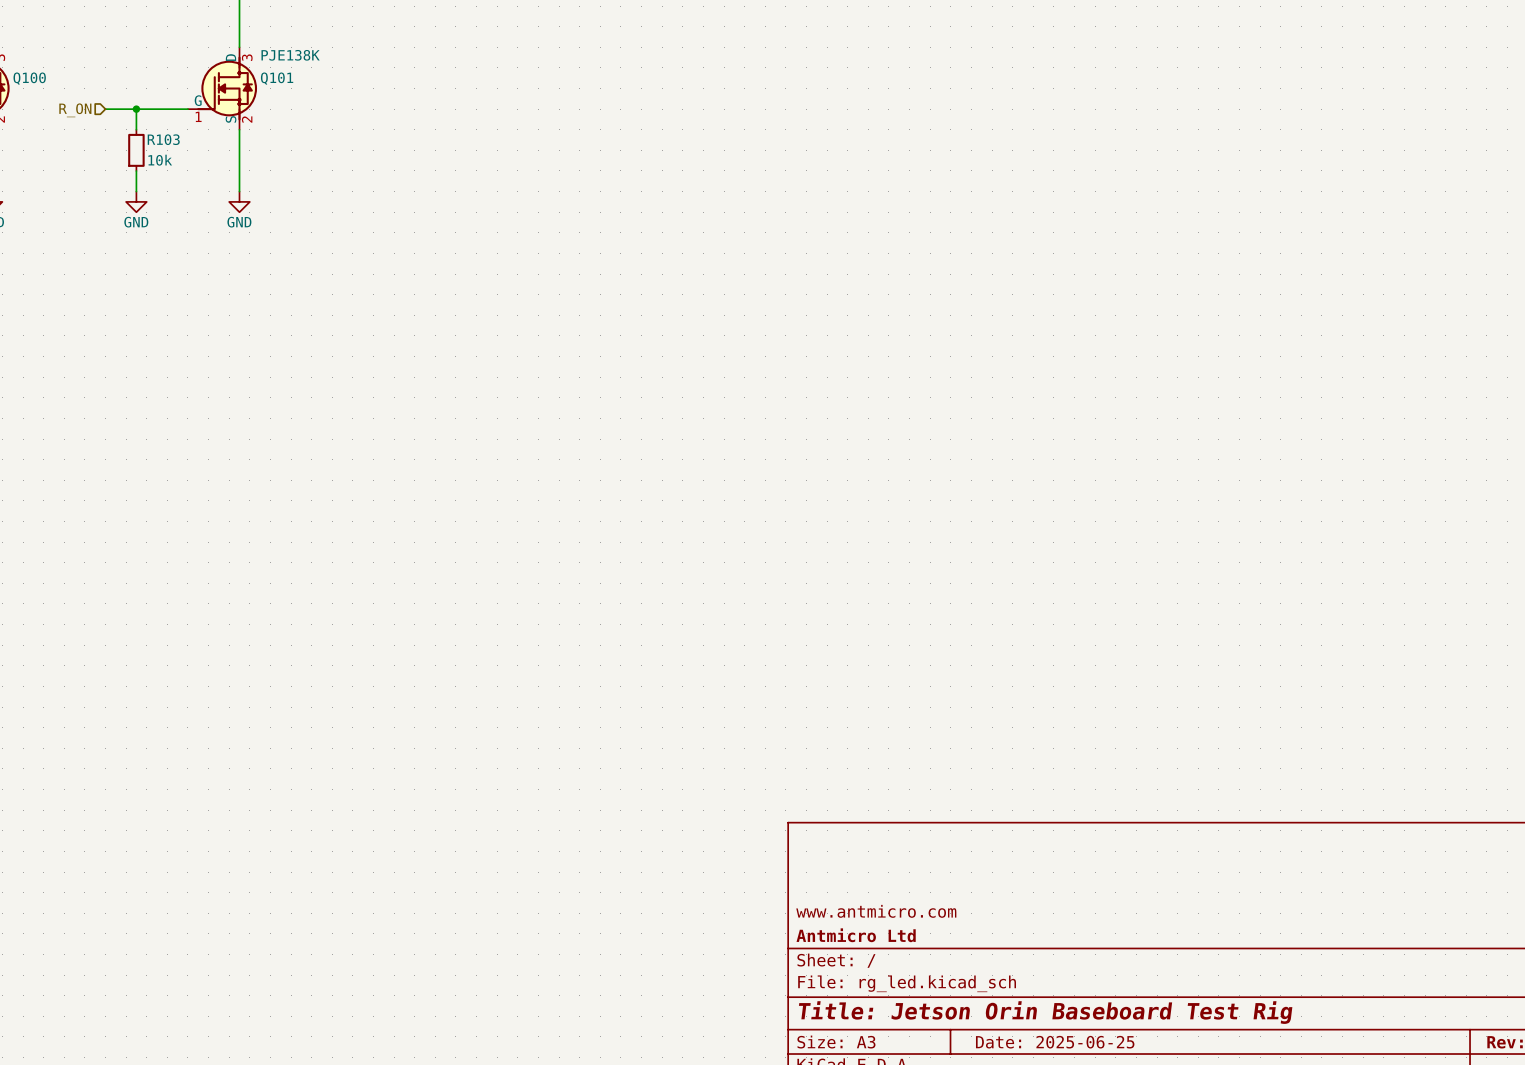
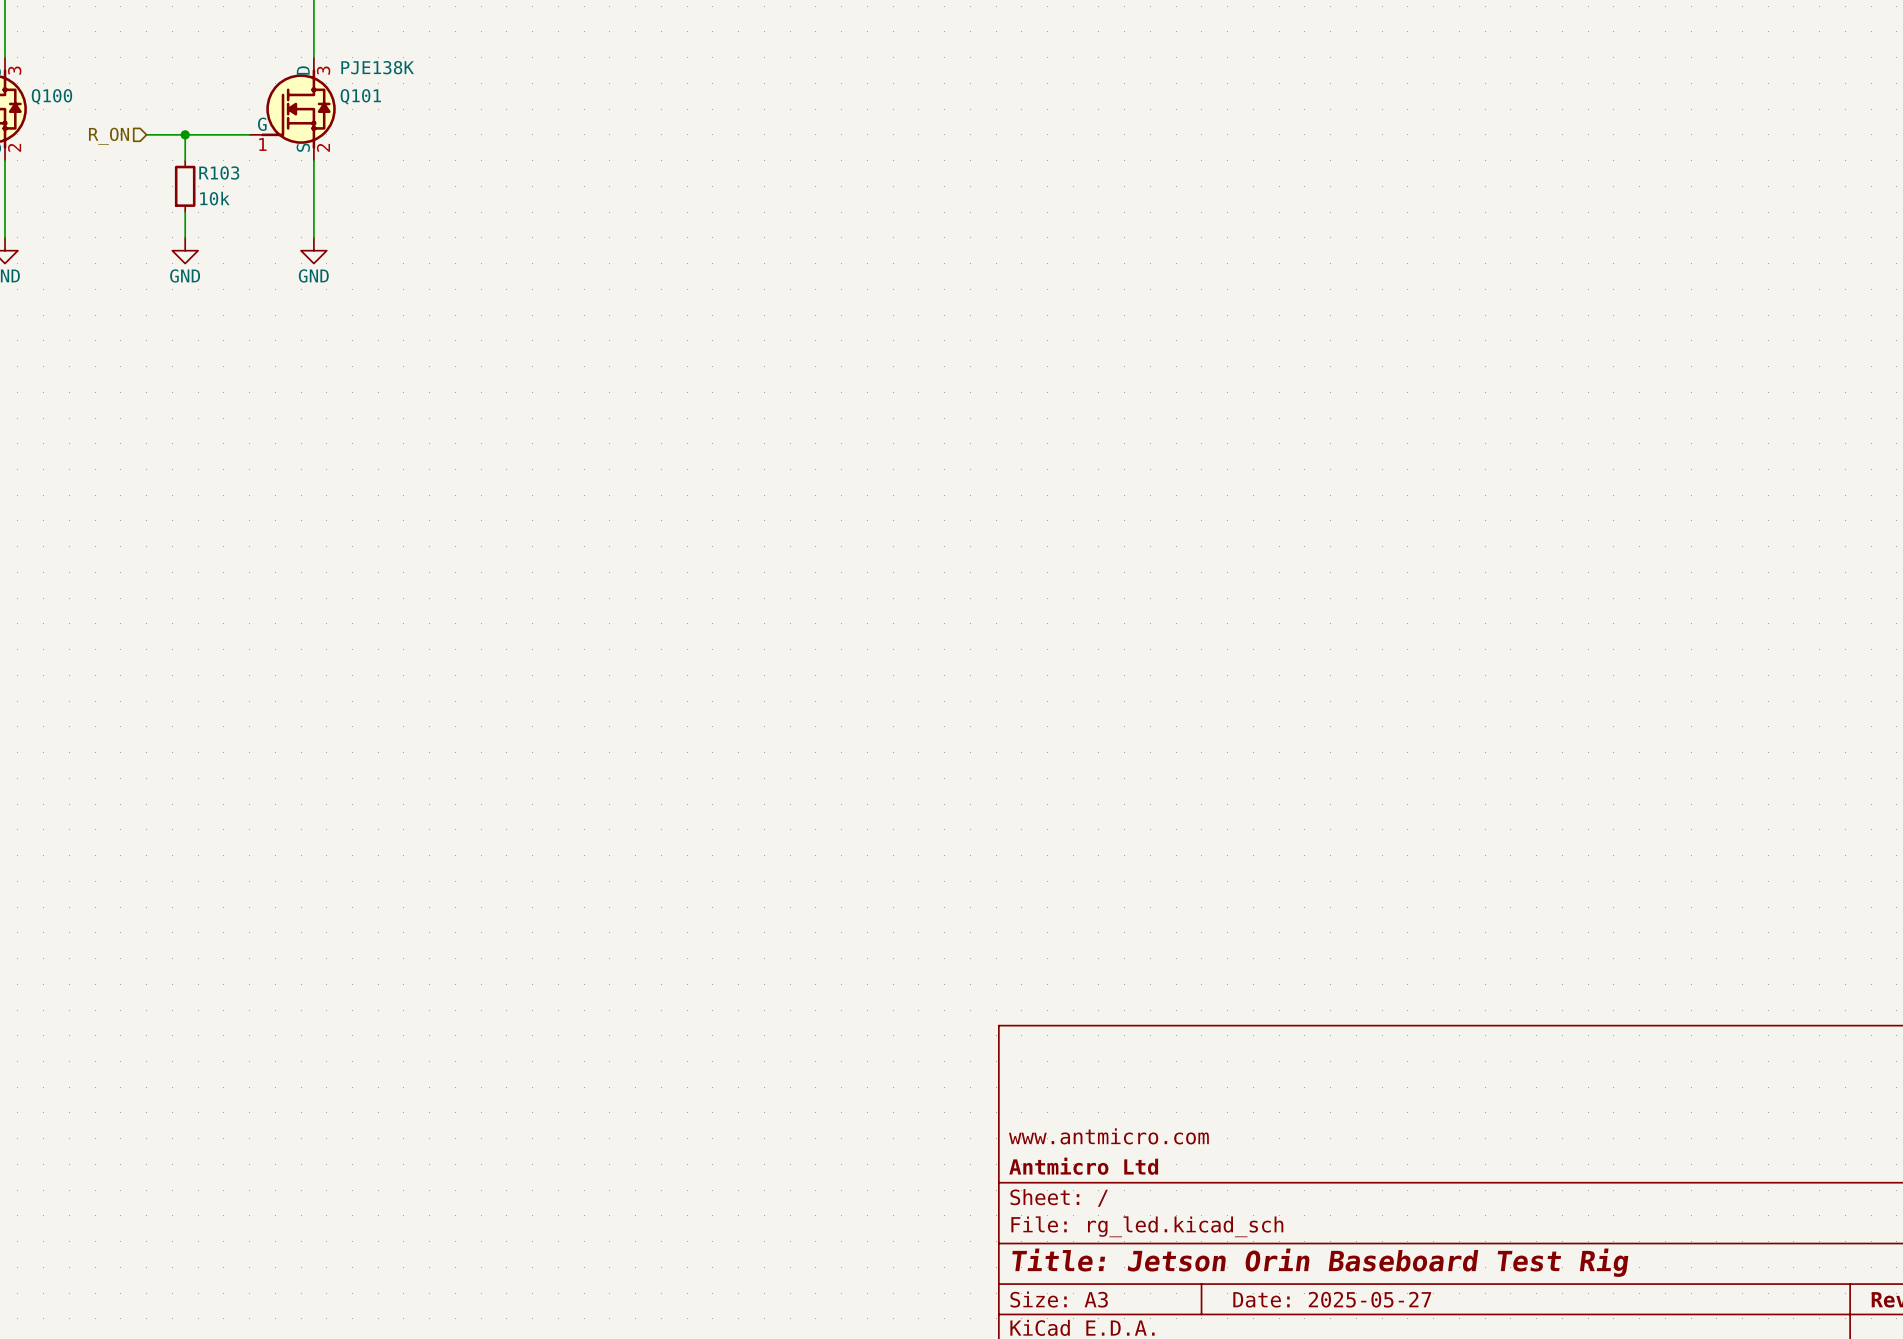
title block: Date: 2025-06-25 (1055, 1042) -> Date: 2025-05-27 (1332, 1299)

